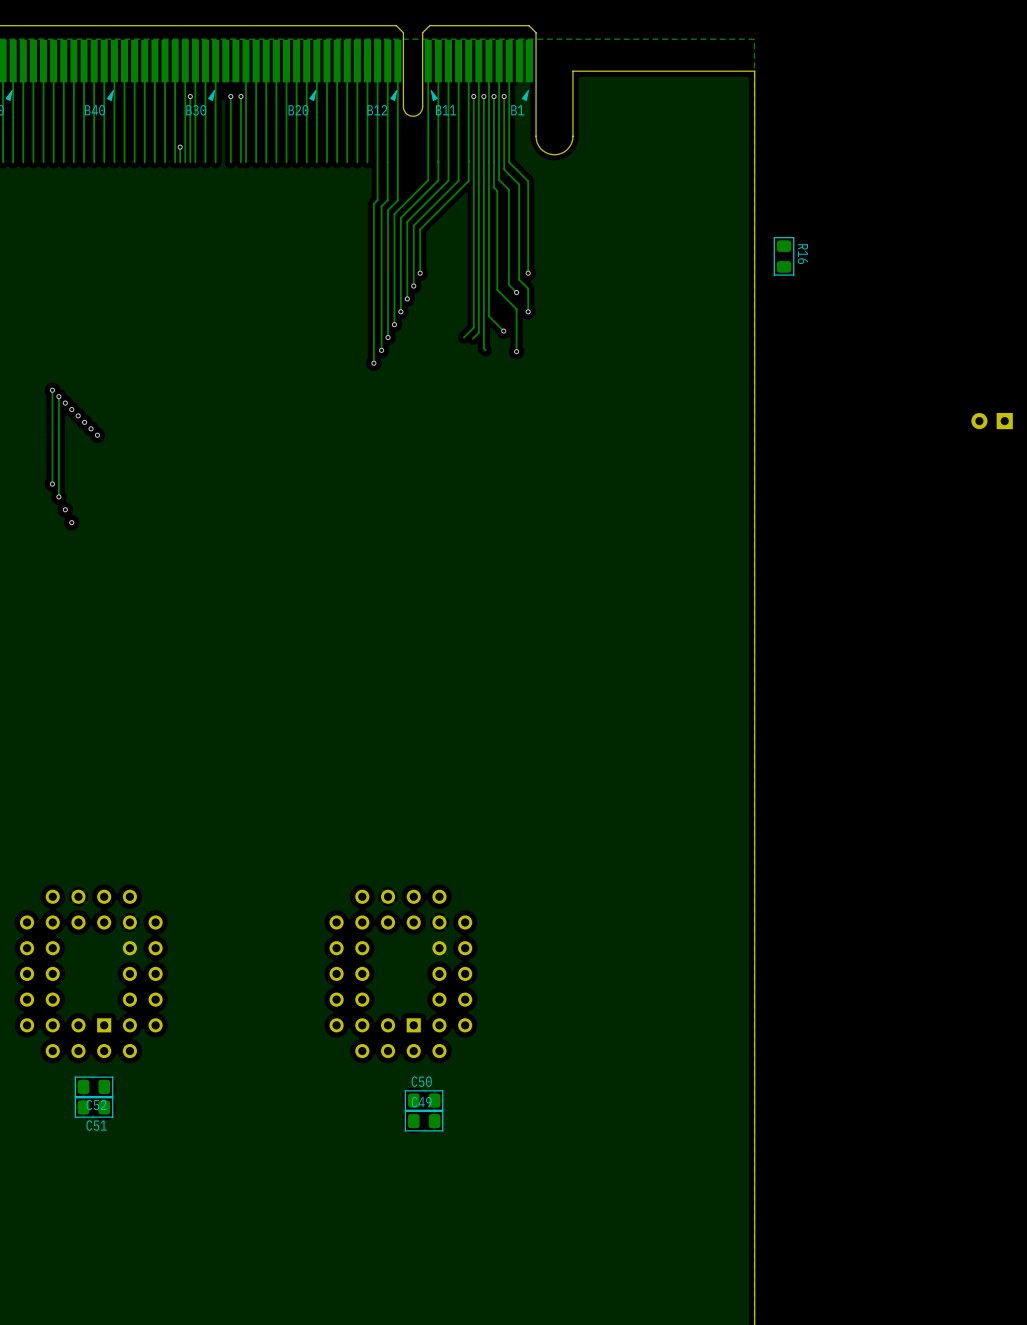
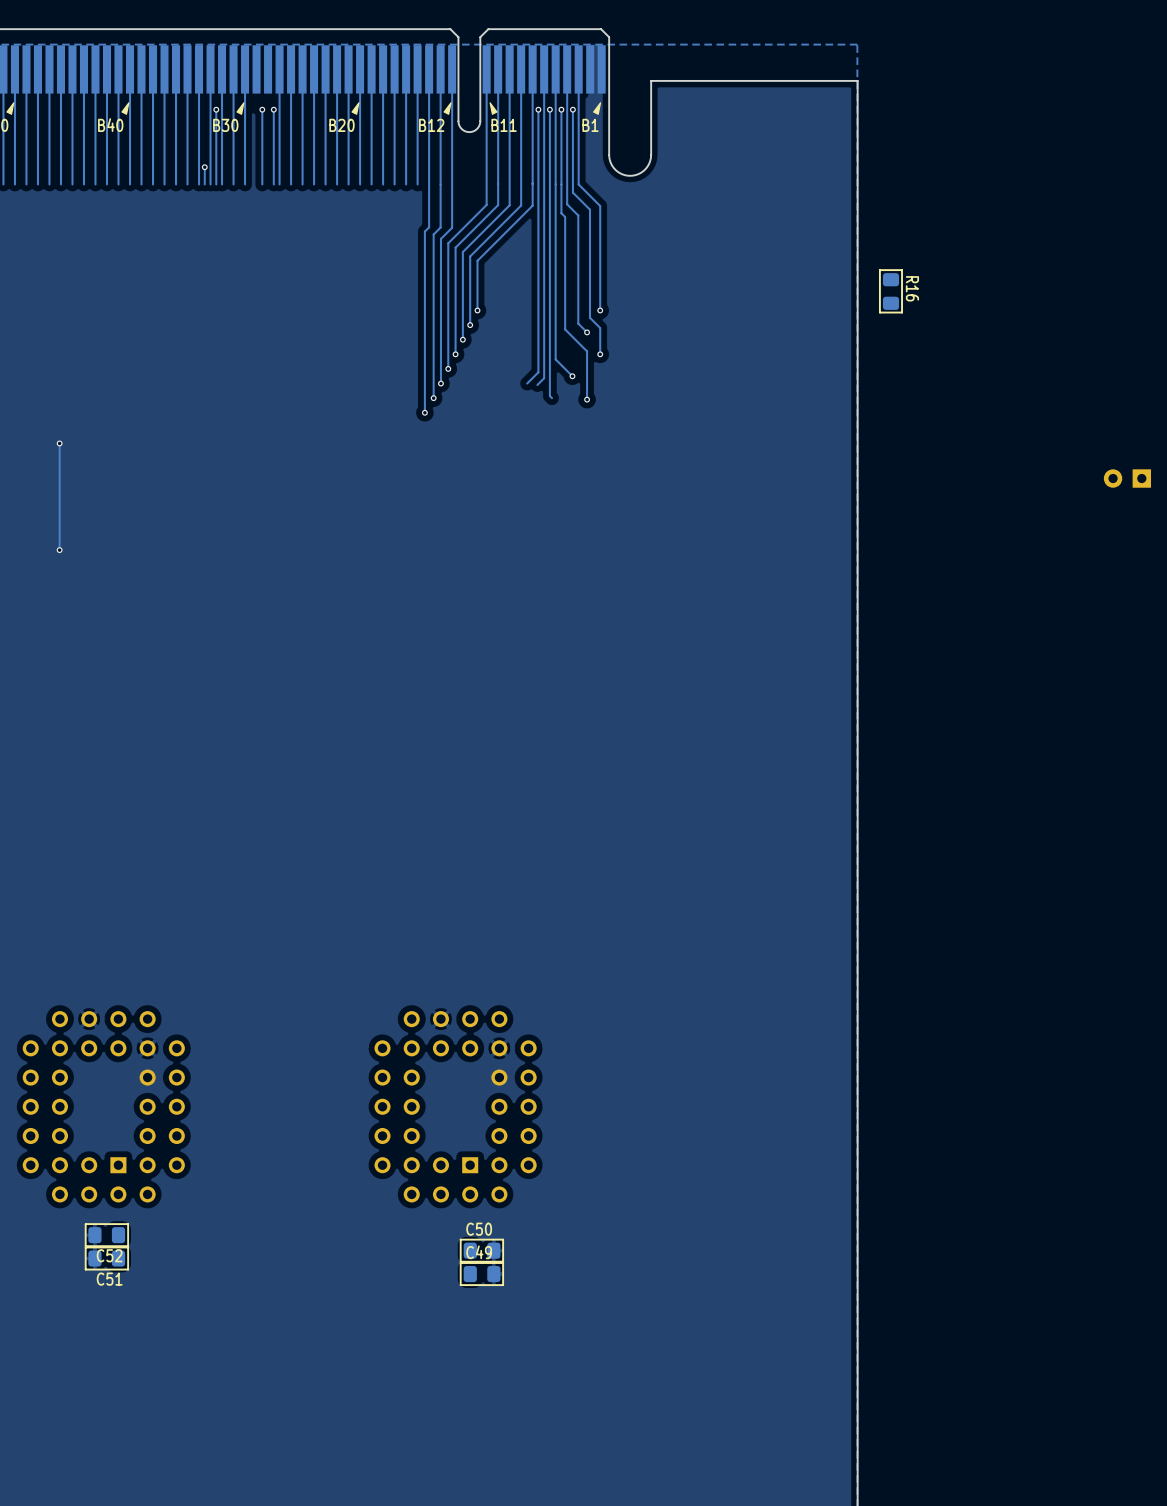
track: (58, 396) (58, 496) -> none
via: (58, 396) -> none
via: (65, 403) -> none
via: (71, 409) -> none
via: (78, 415) -> none
via: (84, 422) -> none
via: (91, 428) -> none
via: (97, 435) -> none
via: (58, 496) -> none
via: (65, 509) -> none
via: (71, 522) -> none

